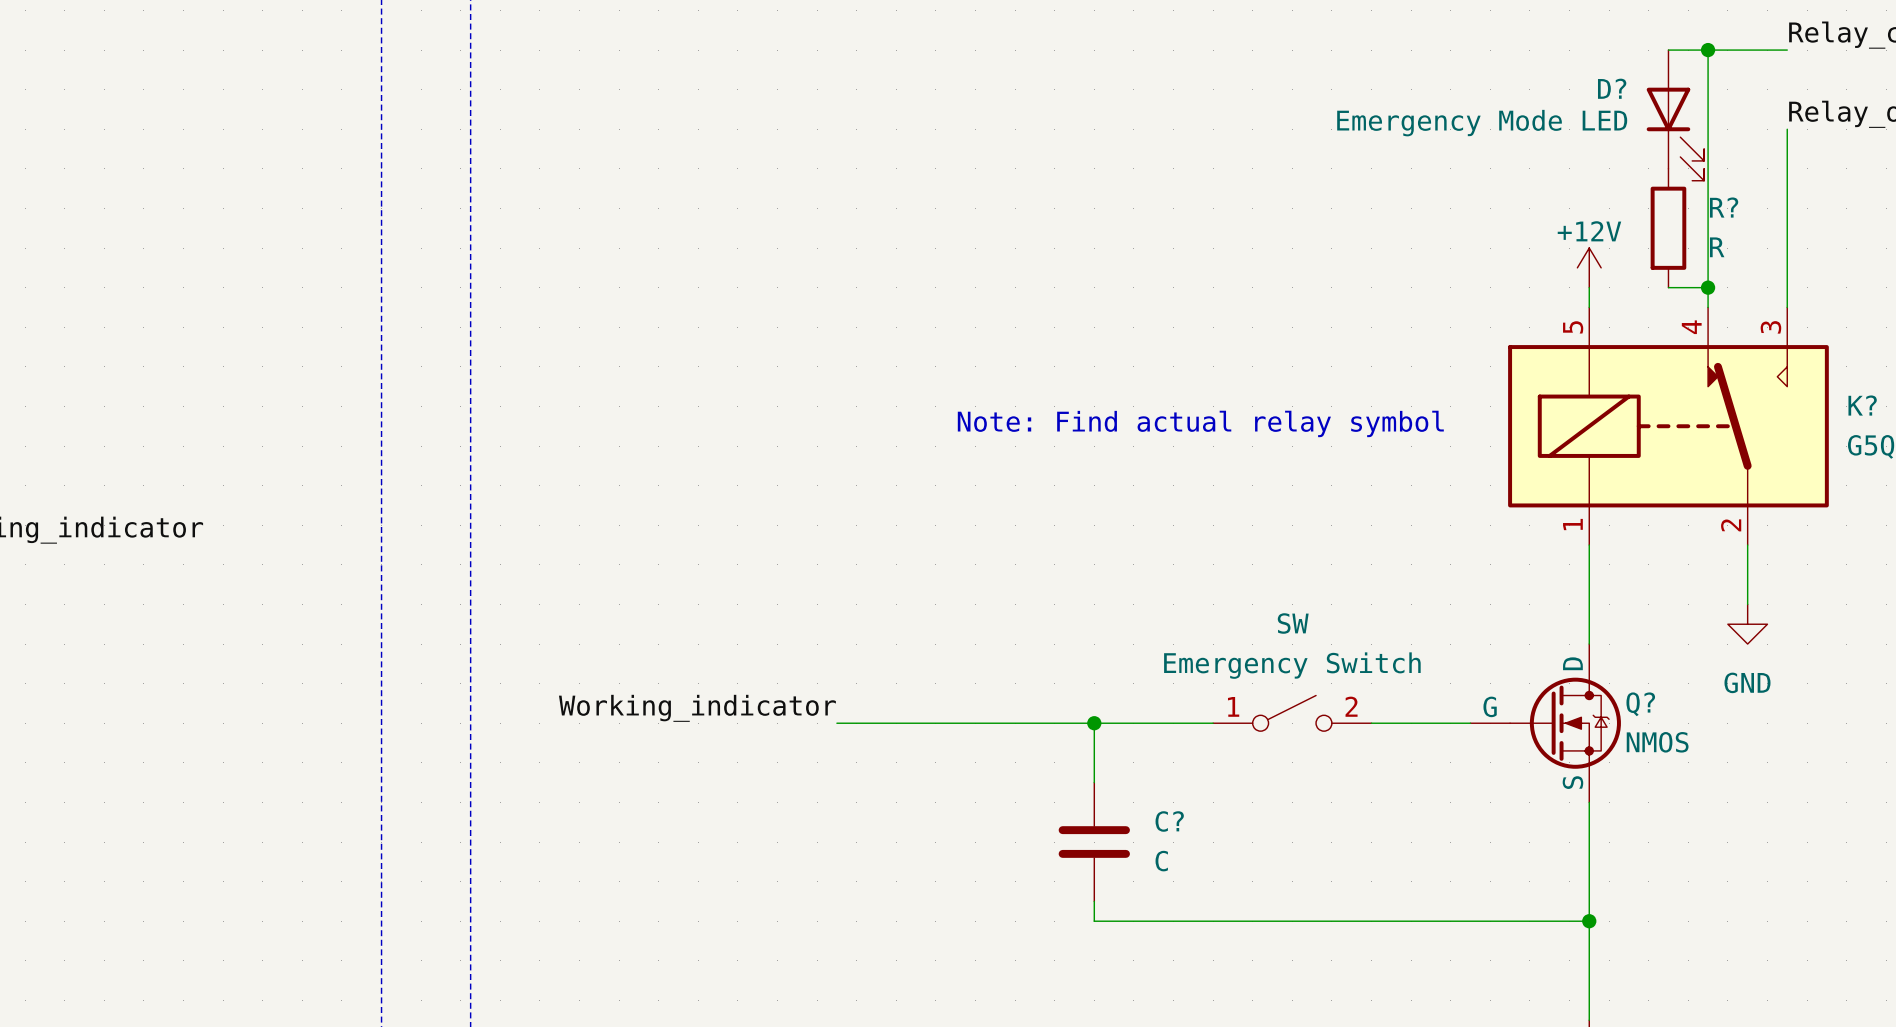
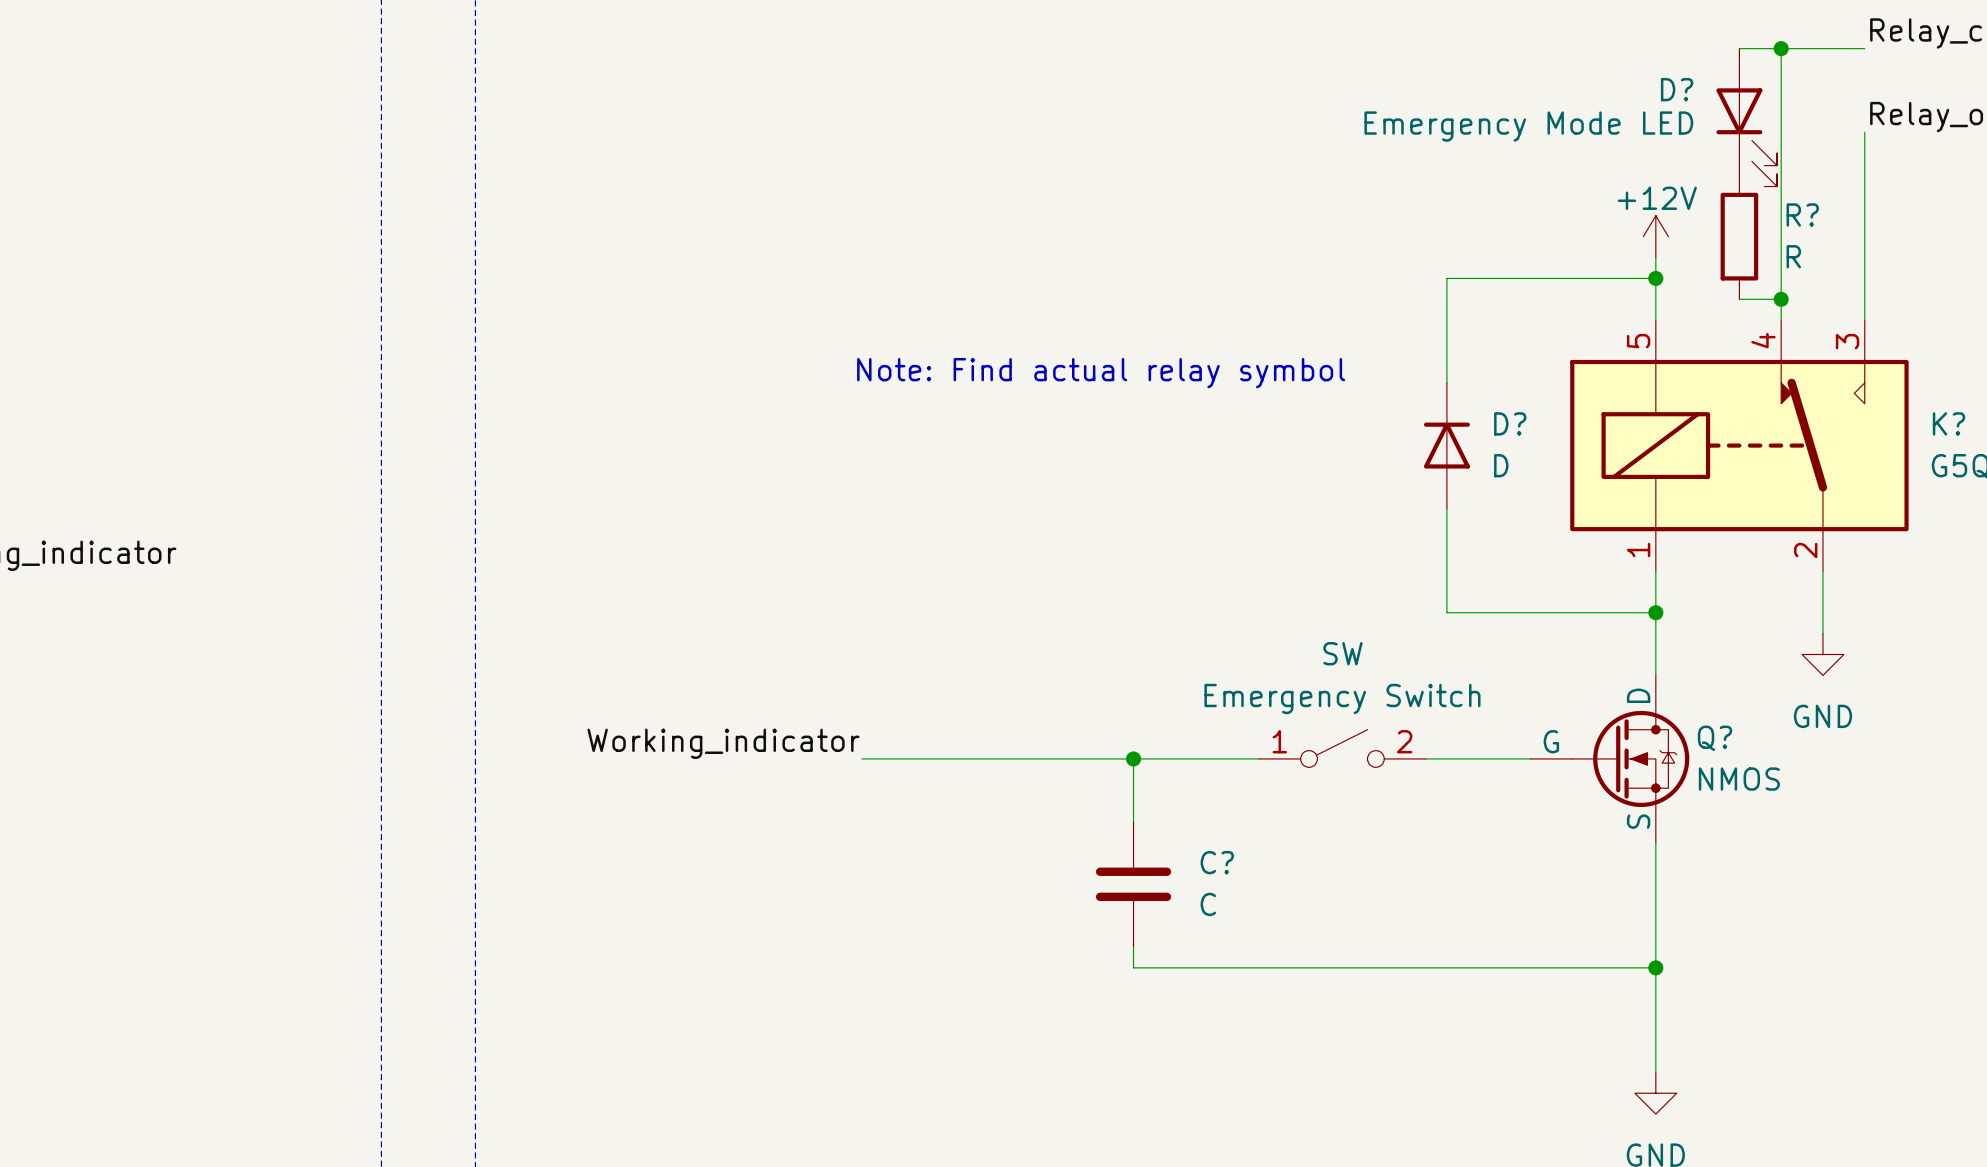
wire: none -> (1655, 278) (1446, 278) (1446, 382)
power symbol position: +12V (1589, 267) -> +12V (1655, 236)
junction: none -> (1655, 278)
text position: Note: Find actual relay symbol (1200, 423) -> Note: Find actual relay symbol (1101, 373)
D?: none -> D (1446, 445)
wire: none -> (1446, 508) (1446, 612) (1655, 612)
junction: none -> (1655, 612)

